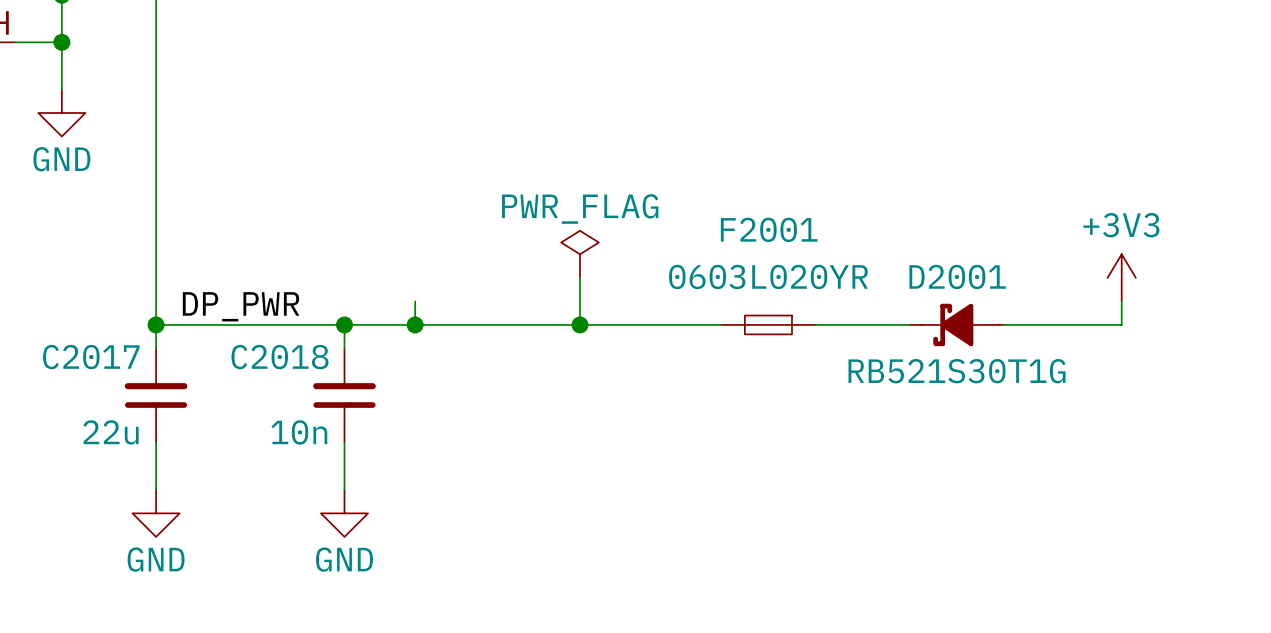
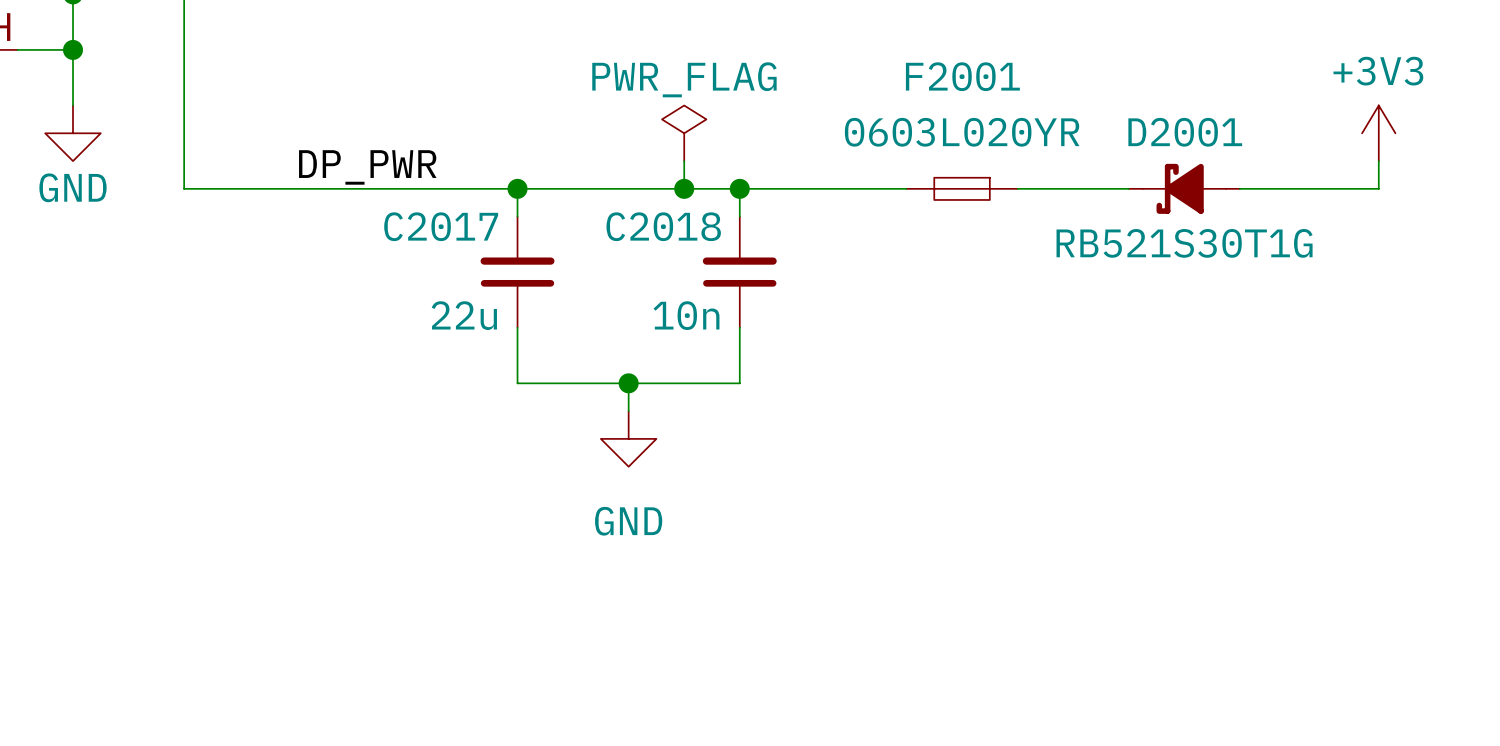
wire: none -> (684, 161) (684, 188)
wire: (156, 160) (156, 348) -> (184, 188) (906, 188)
wire: none -> (517, 188) (517, 216)
junction: none -> (517, 188)
junction: none -> (684, 188)
junction: none -> (739, 188)
power symbol position: PWR_FLAG (580, 254) -> PWR_FLAG (684, 133)
wire: (580, 277) (580, 324) -> none
power symbol position: +3V3 (1121, 277) -> +3V3 (1378, 133)
wire: (415, 301) (415, 324) -> (628, 383) (628, 411)
wire: (1121, 301) (1121, 324) (1003, 324) -> (1378, 161) (1378, 188) (1239, 188)
label position: DP_PWR (241, 306) -> DP_PWR (367, 167)
wire: (156, 324) (438, 324) -> (517, 327) (517, 383)
junction: (156, 324) -> none
wire: (344, 324) (344, 348) -> (739, 188) (739, 216)
junction: (344, 324) -> none
junction: (415, 324) -> none
junction position: (580, 324) -> (628, 383)
wire: (627, 324) (721, 324) -> (739, 383) (739, 327)
F2001 position: (768, 324) -> (962, 188)
wire: (815, 324) (909, 324) -> (1017, 188) (1128, 188)
D2001 position: (956, 324) -> (1184, 188)
power symbol: none -> GND (628, 438)
C2017 position: (156, 395) -> (517, 272)
C2018 position: (344, 395) -> (739, 272)
wire: (156, 442) (156, 489) -> none
wire: (344, 442) (344, 489) -> none
power symbol: GND (156, 513) -> none
power symbol: GND (344, 513) -> none

